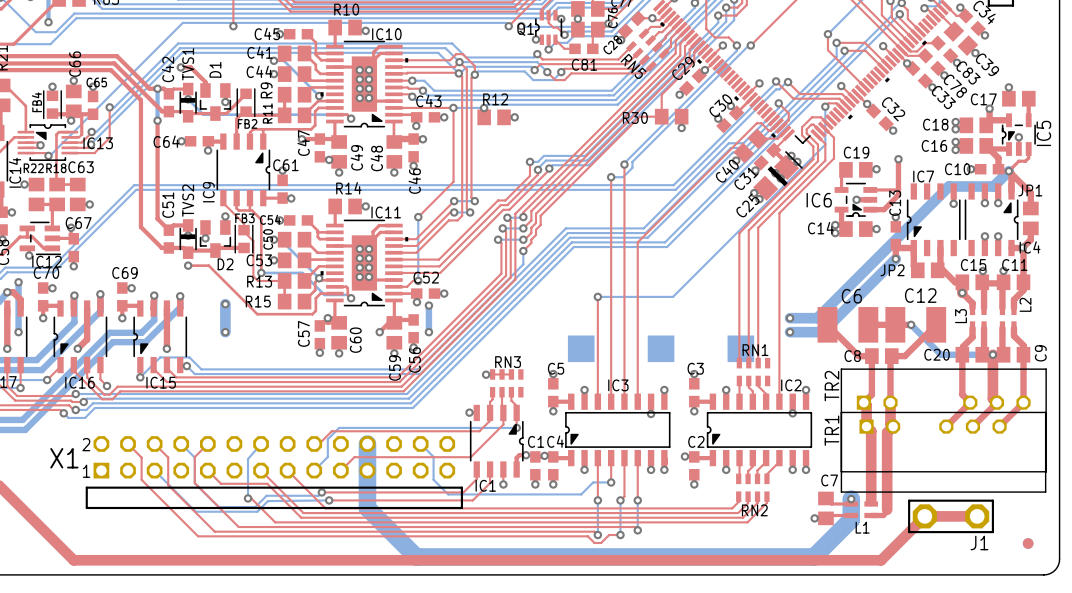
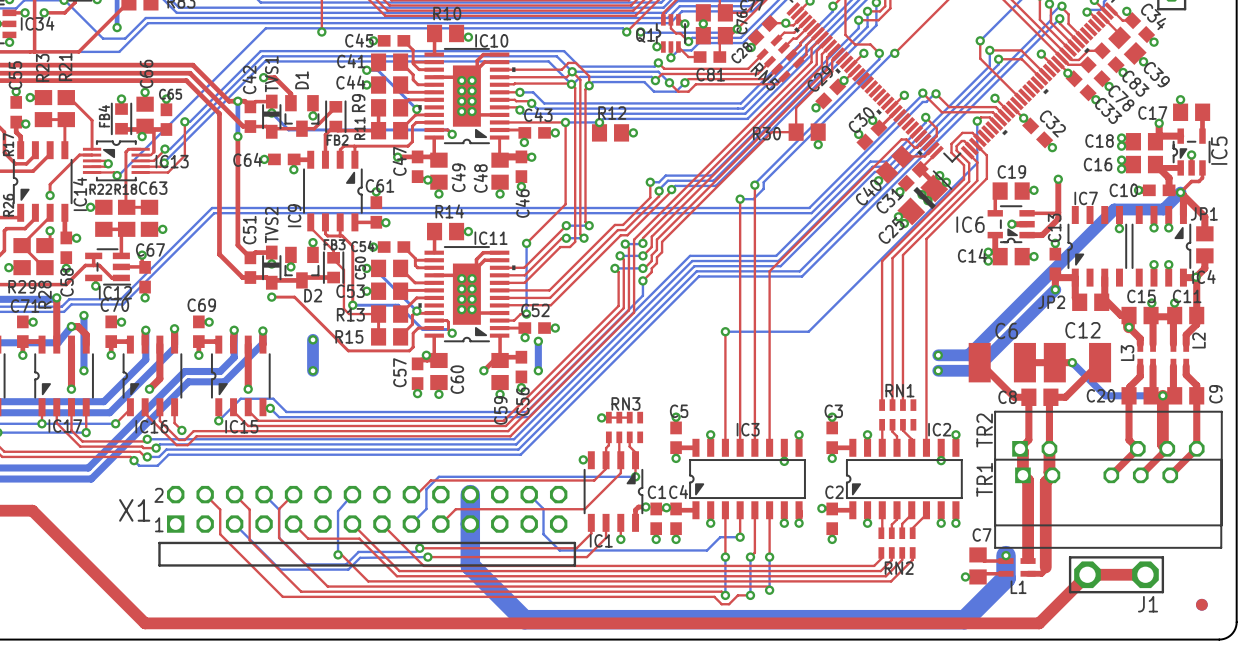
drawing: [567, 335, 595, 363] -> none
drawing: [647, 335, 675, 363] -> none
drawing: [727, 335, 755, 363] -> none

